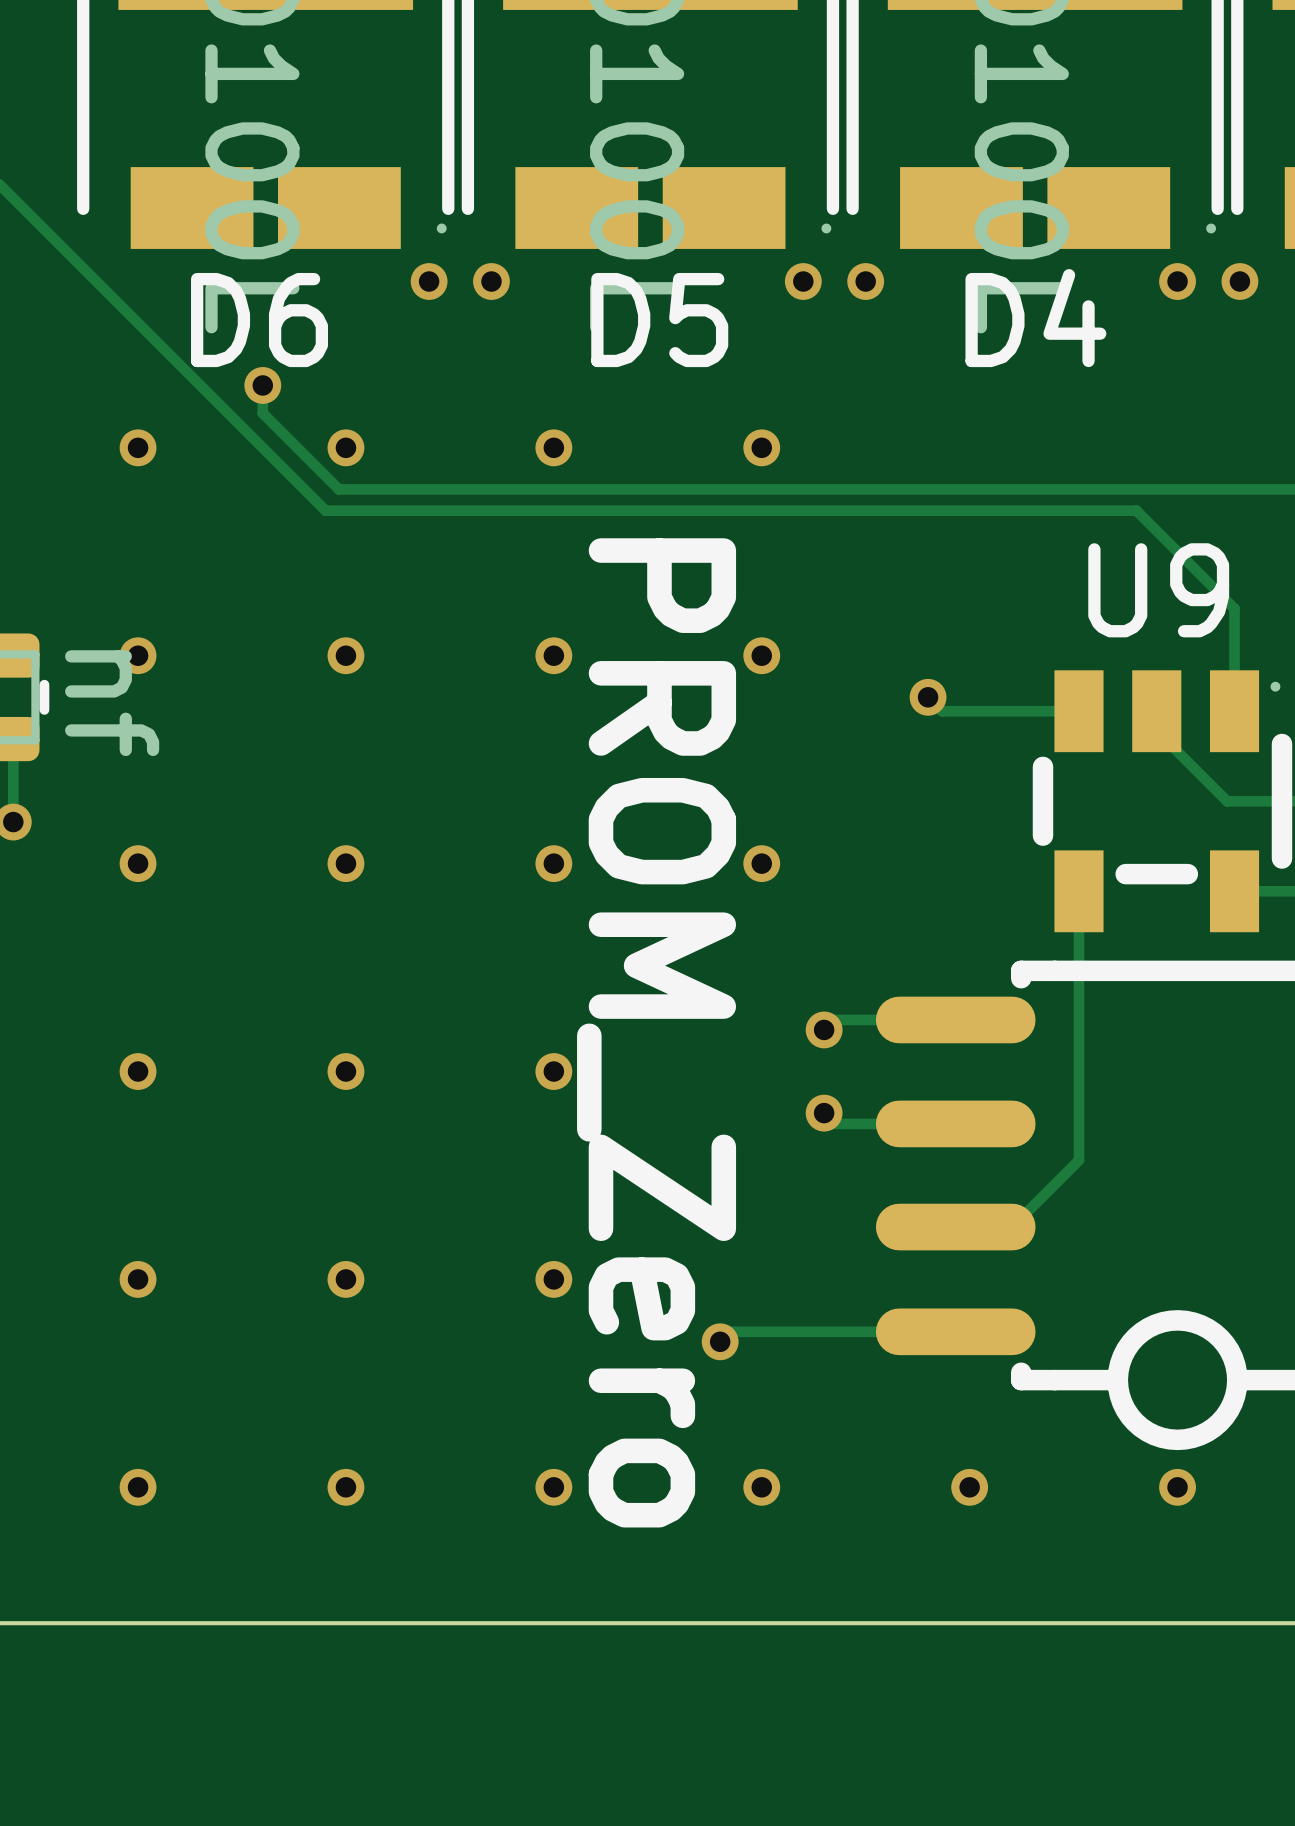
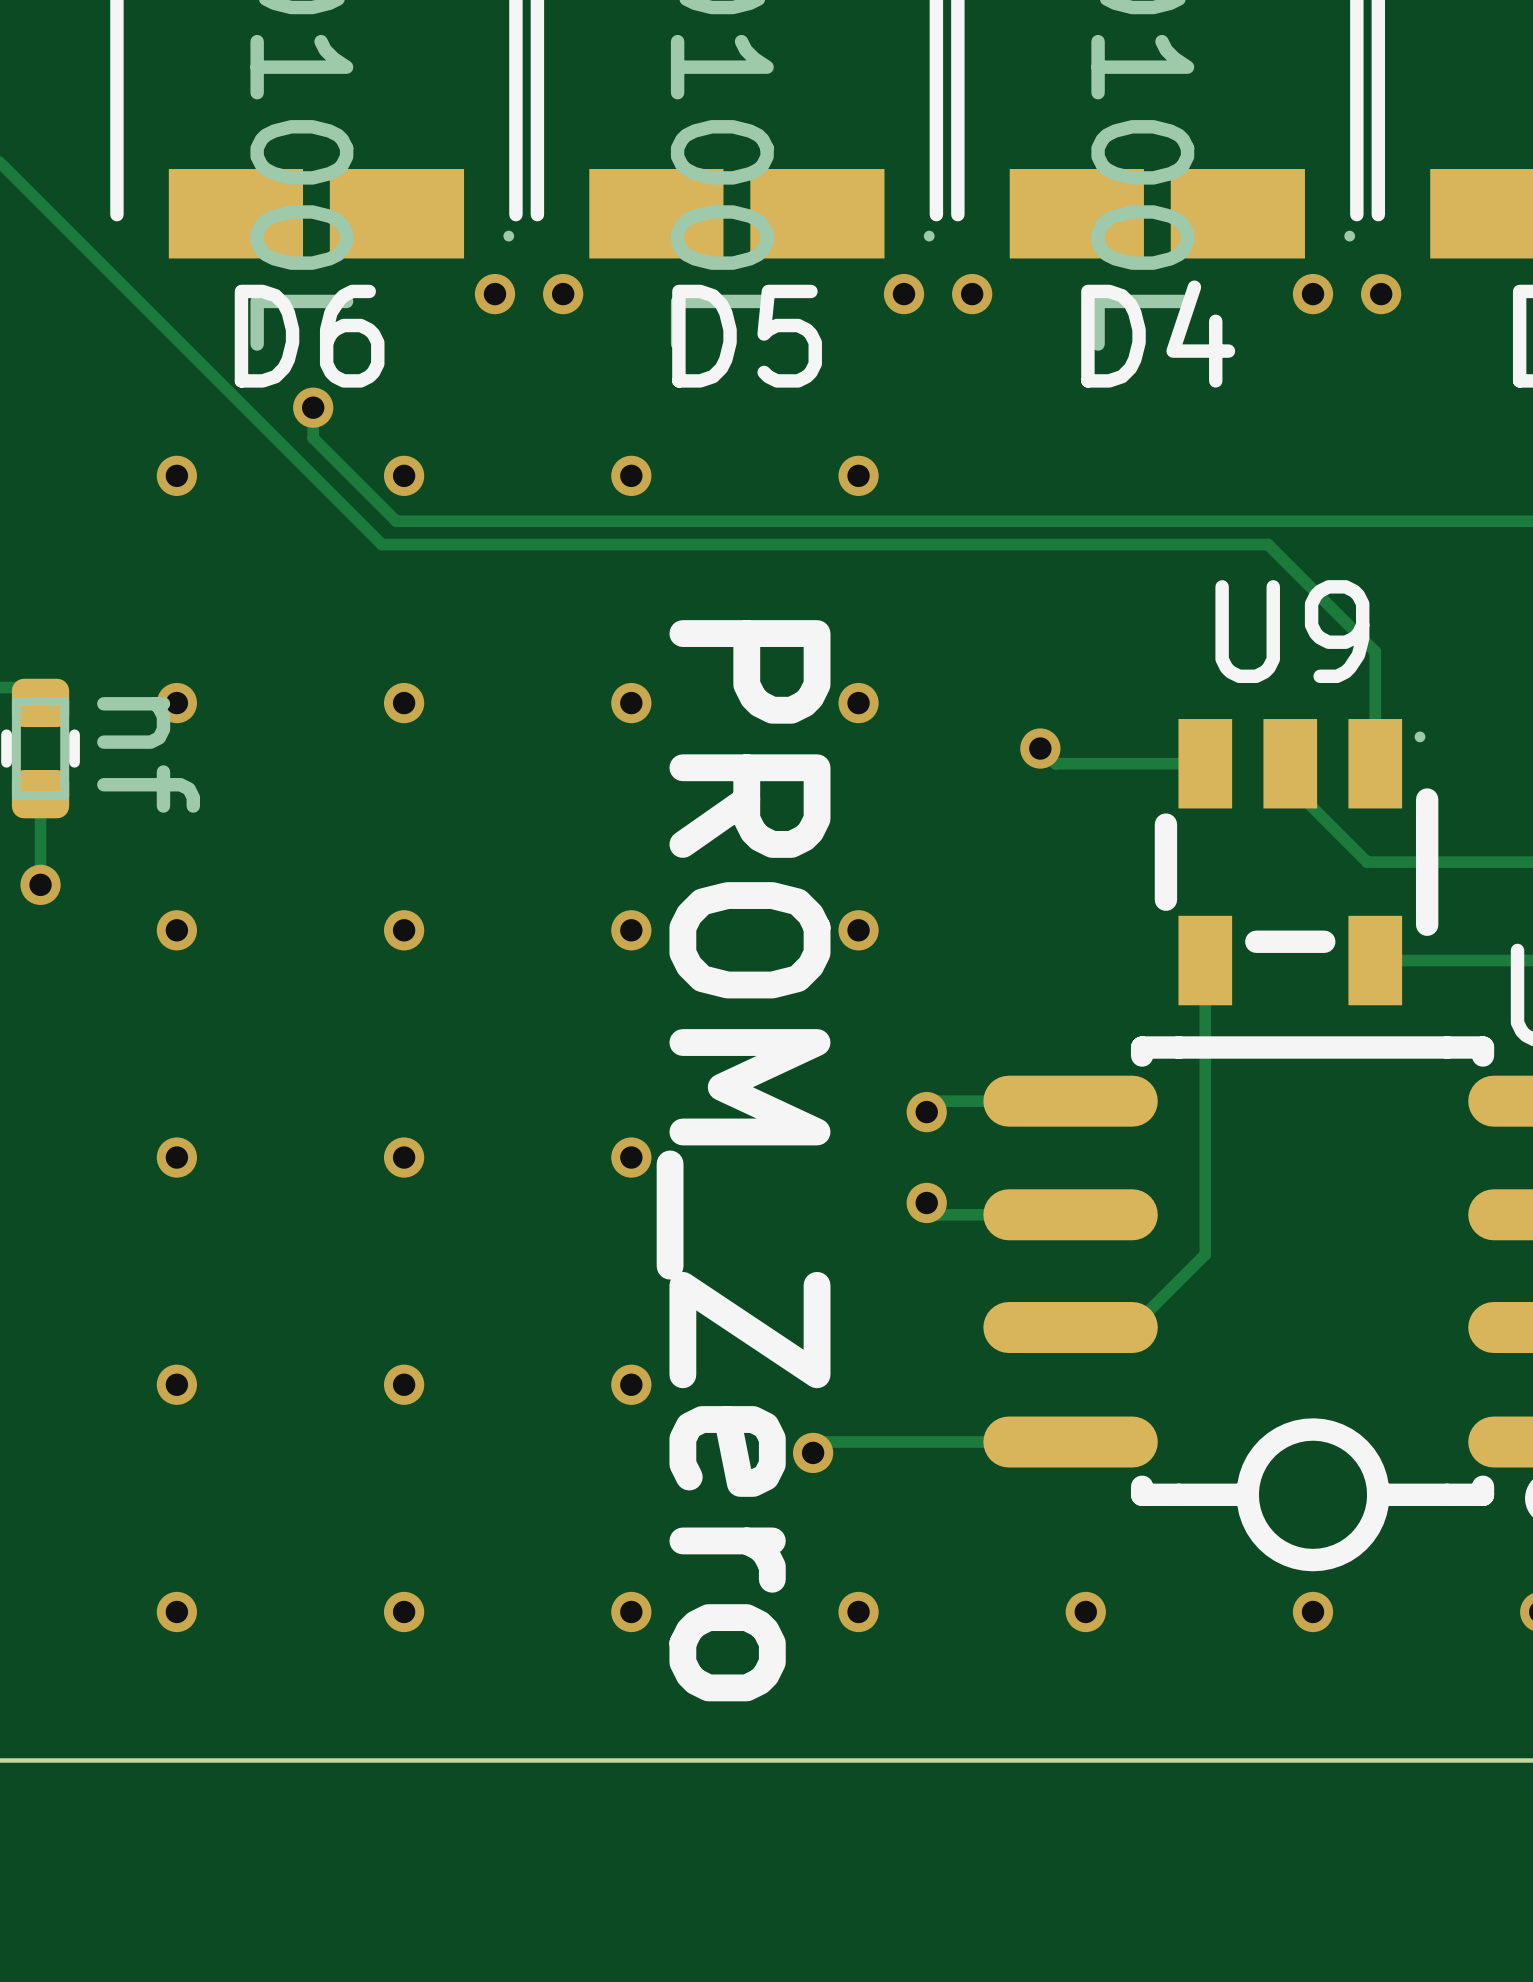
text position: PROM_Zero (656, 1032) -> PROM_Zero (743, 1160)

